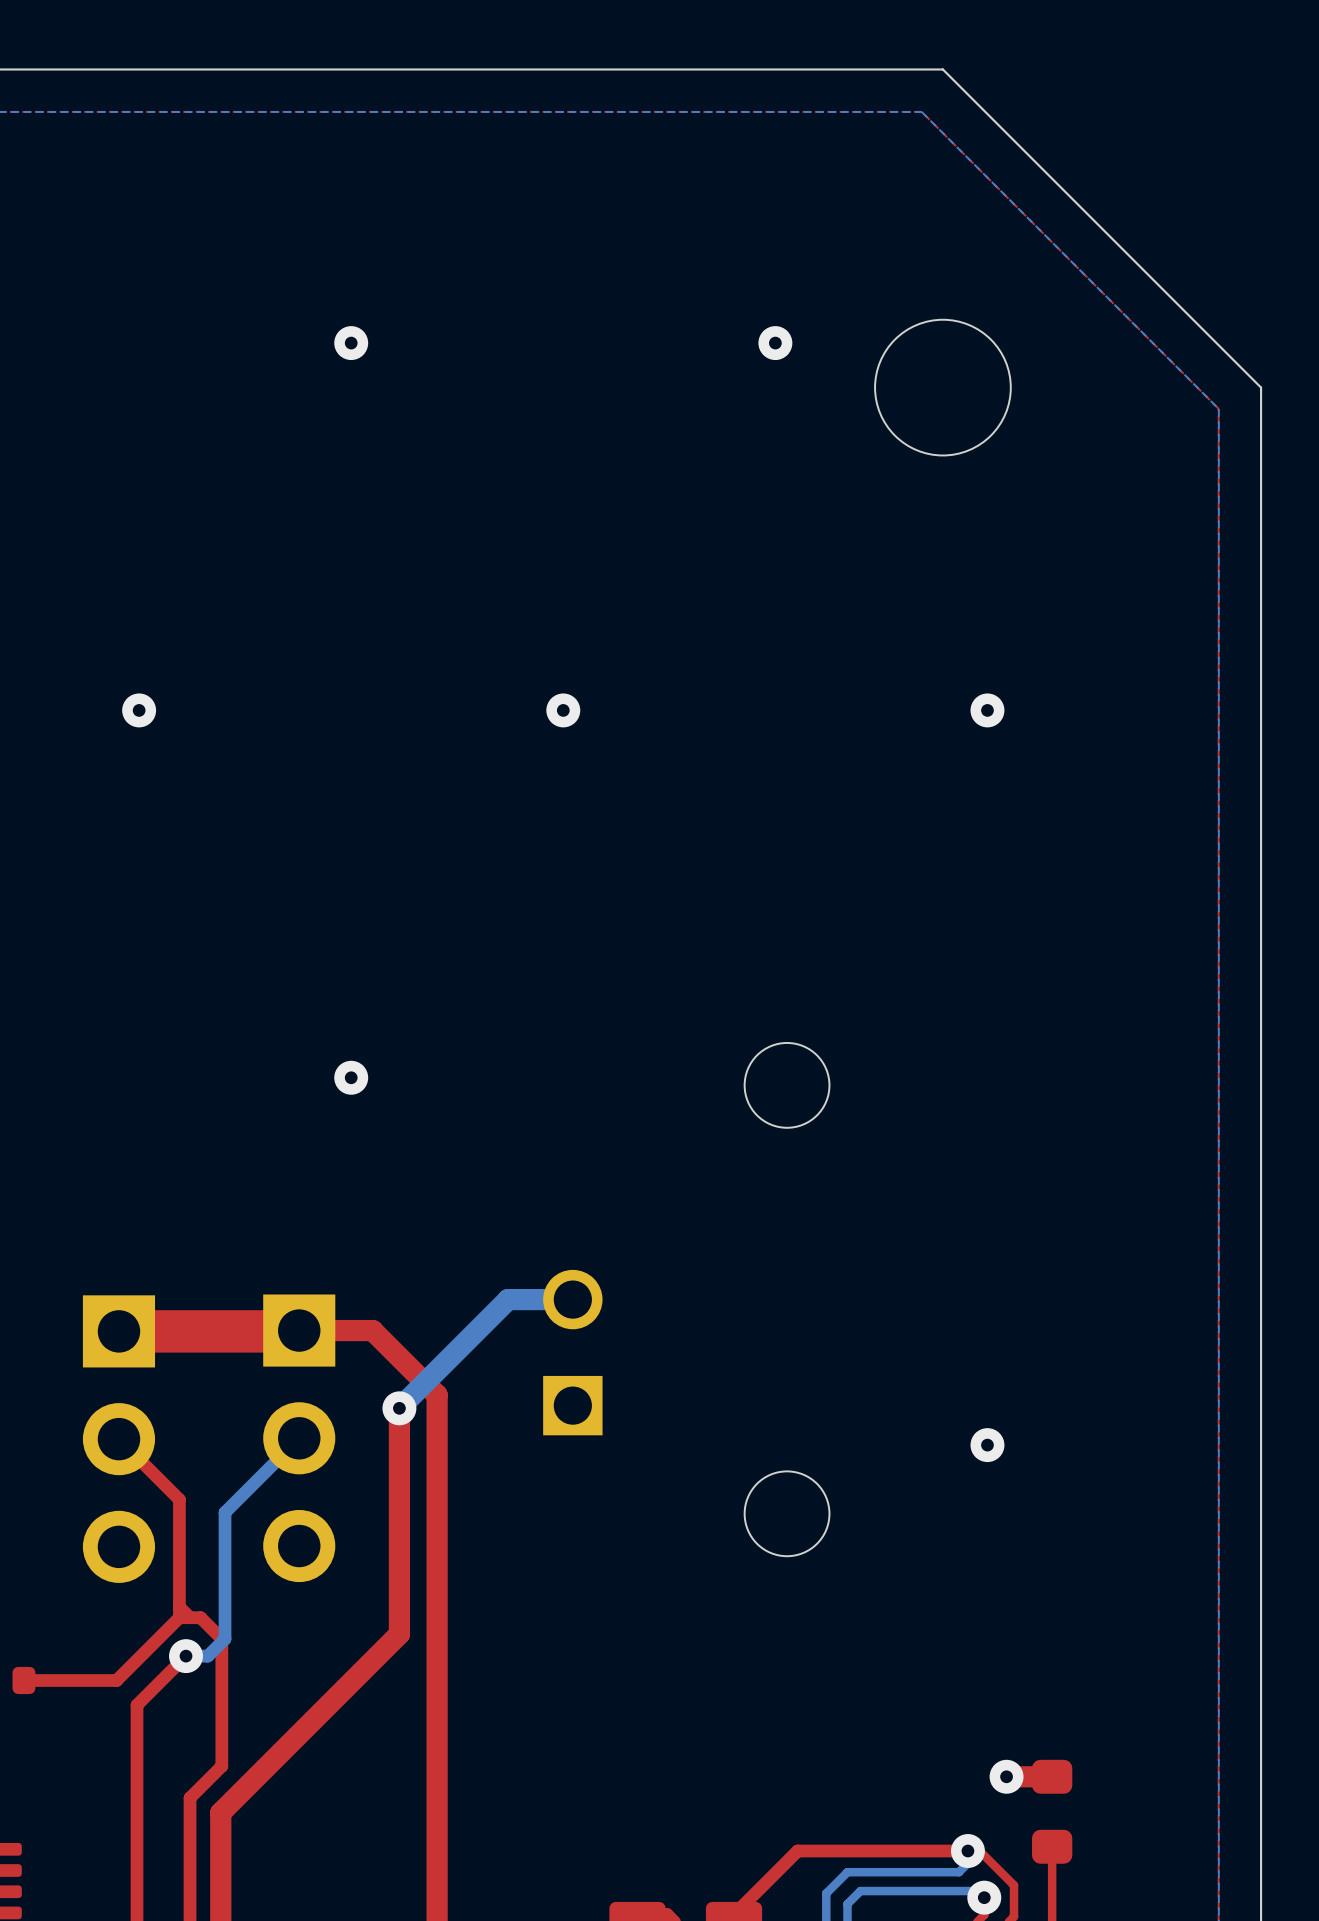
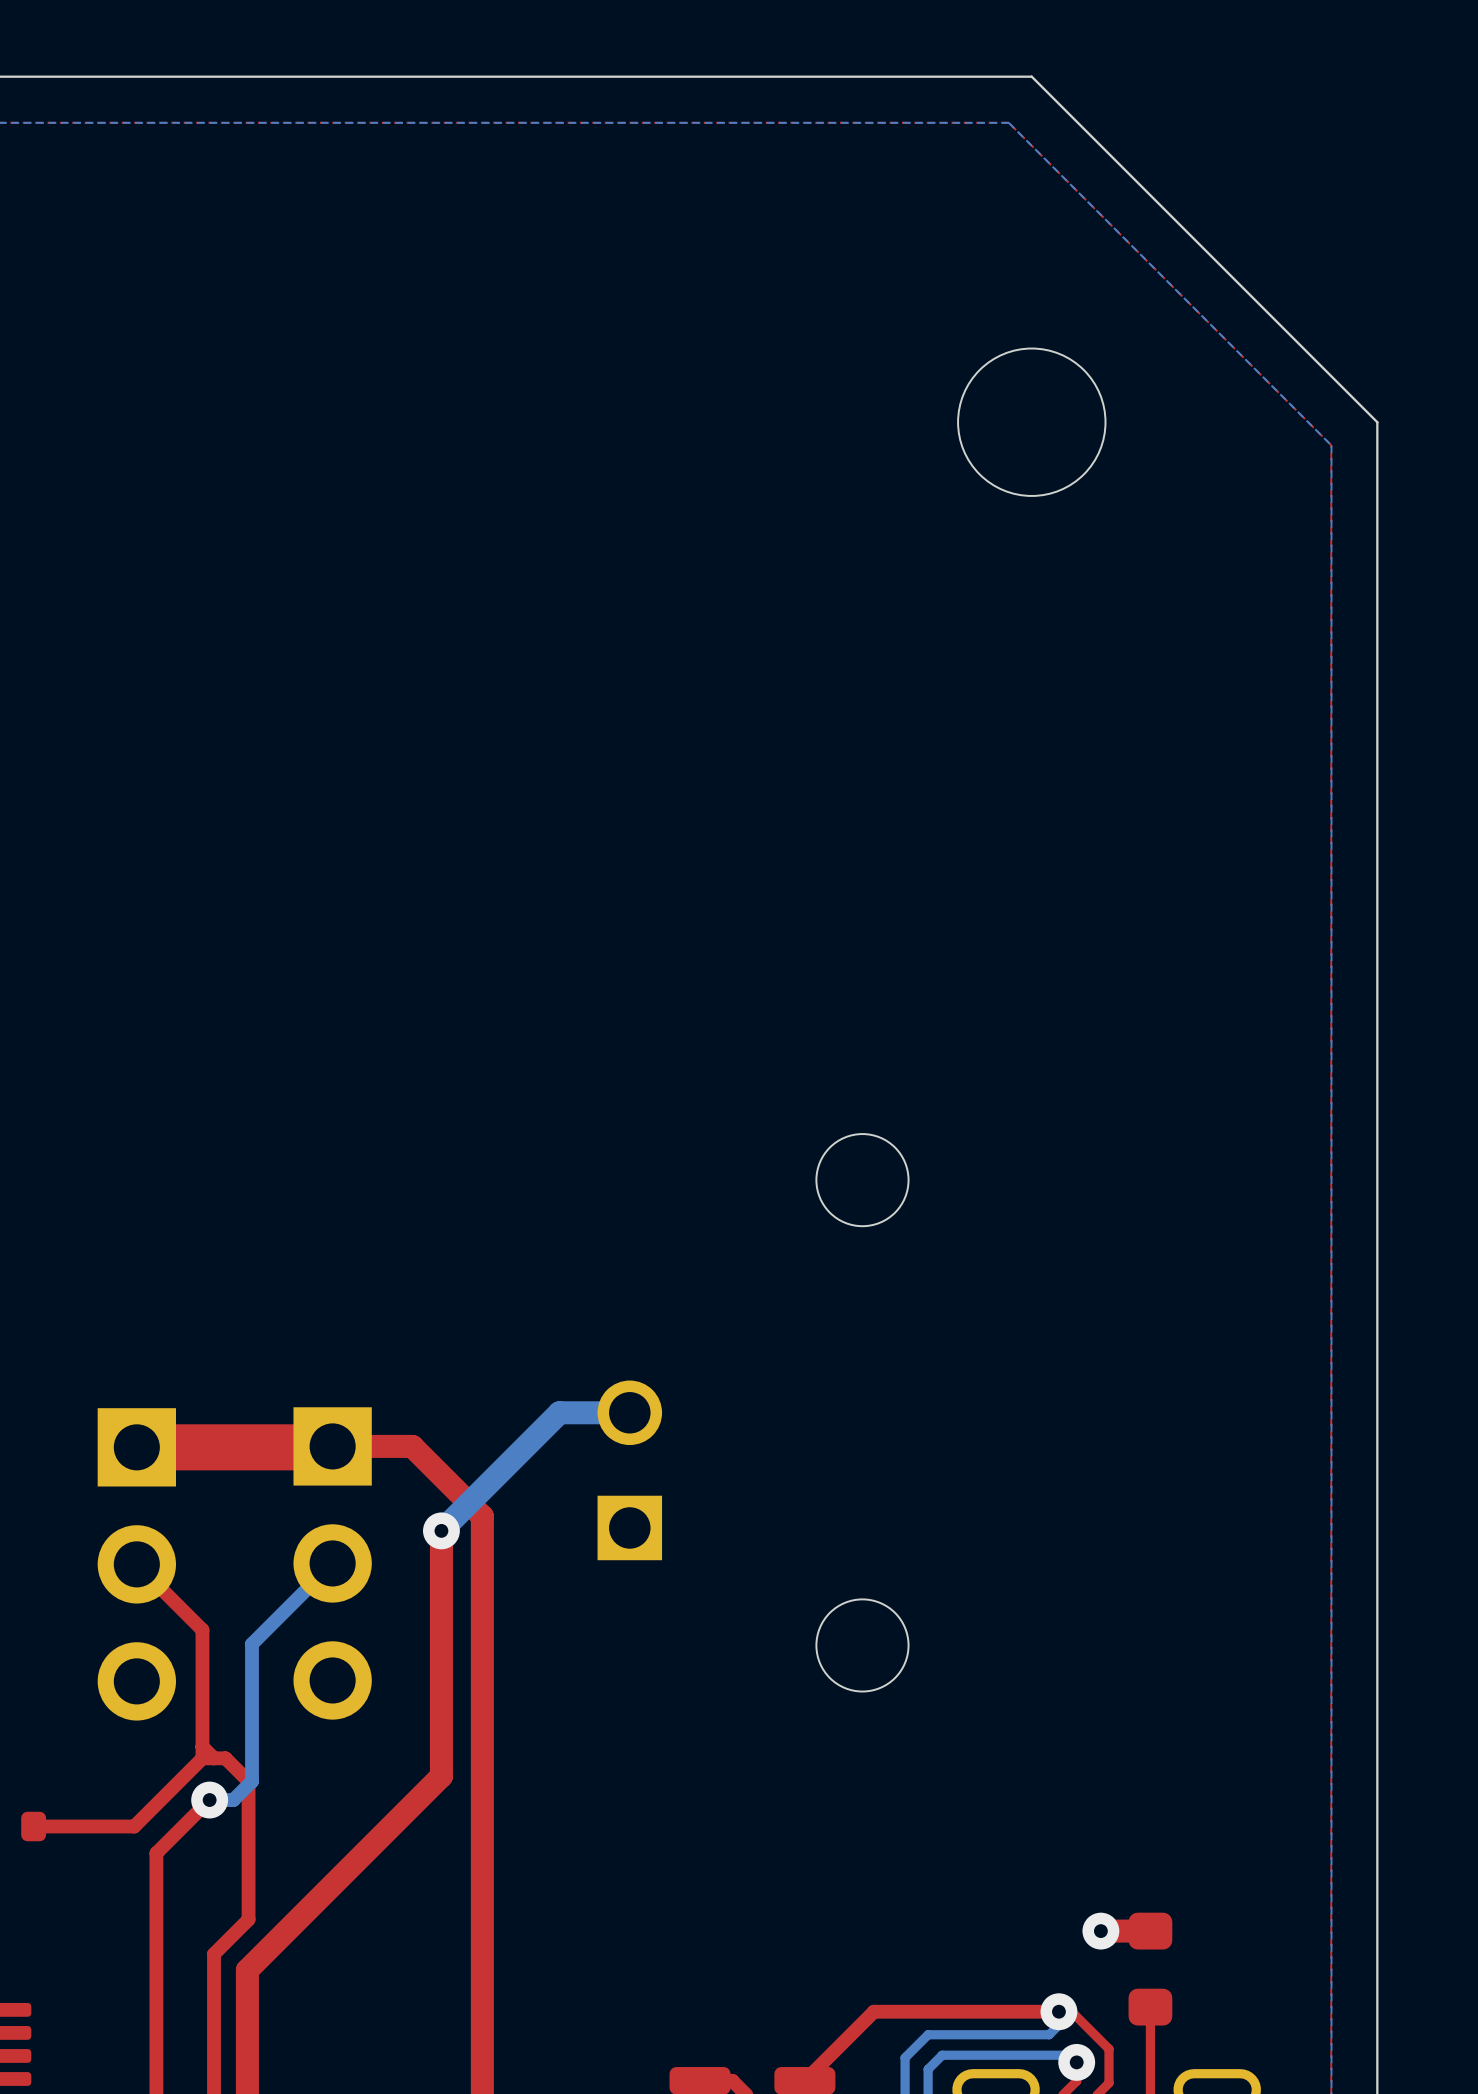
via: (351, 343) -> none
via: (775, 343) -> none
via: (139, 710) -> none
via: (563, 710) -> none
via: (987, 710) -> none
via: (351, 1077) -> none
via: (987, 1445) -> none

